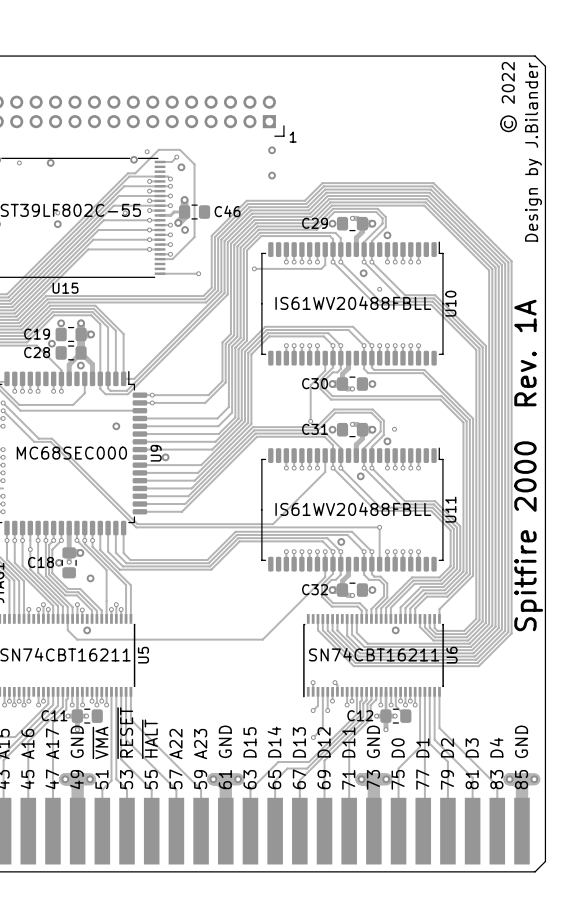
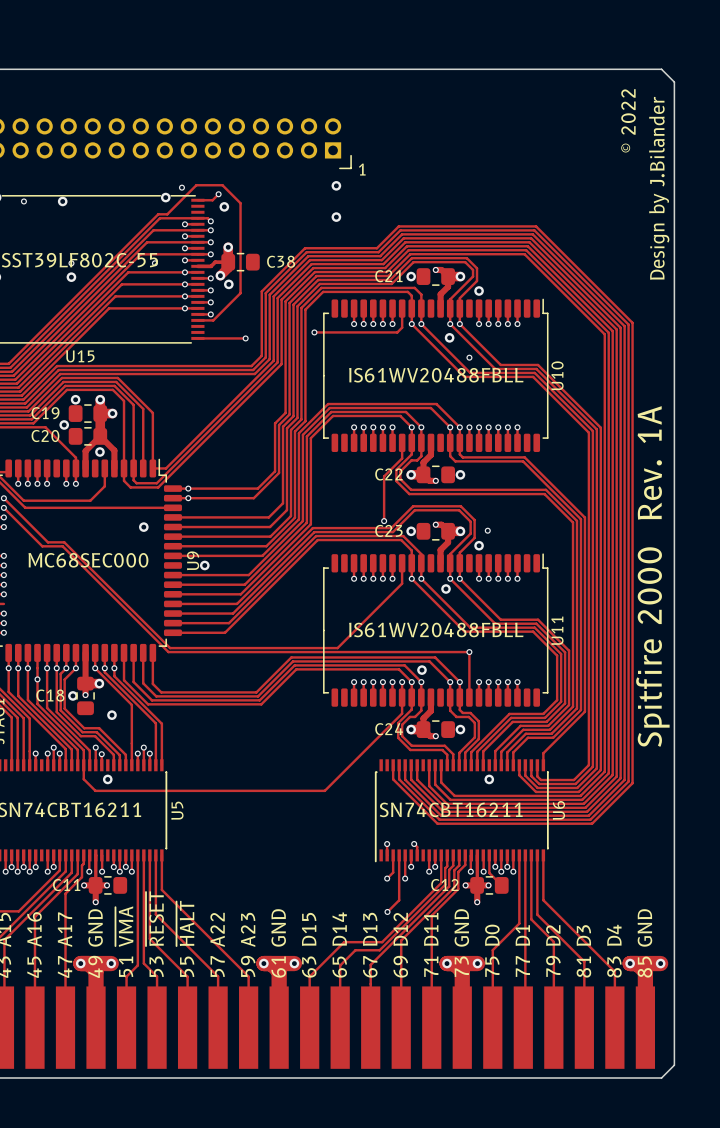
C46 name: C46 (227, 211) -> C38 (281, 261)
C29 name: C29 (315, 223) -> C21 (388, 276)
C28 name: C28 (37, 352) -> C20 (45, 436)
C30 name: C30 (315, 383) -> C22 (388, 474)
C31 name: C31 (315, 429) -> C23 (388, 530)
C32 name: C32 (315, 589) -> C24 (389, 729)

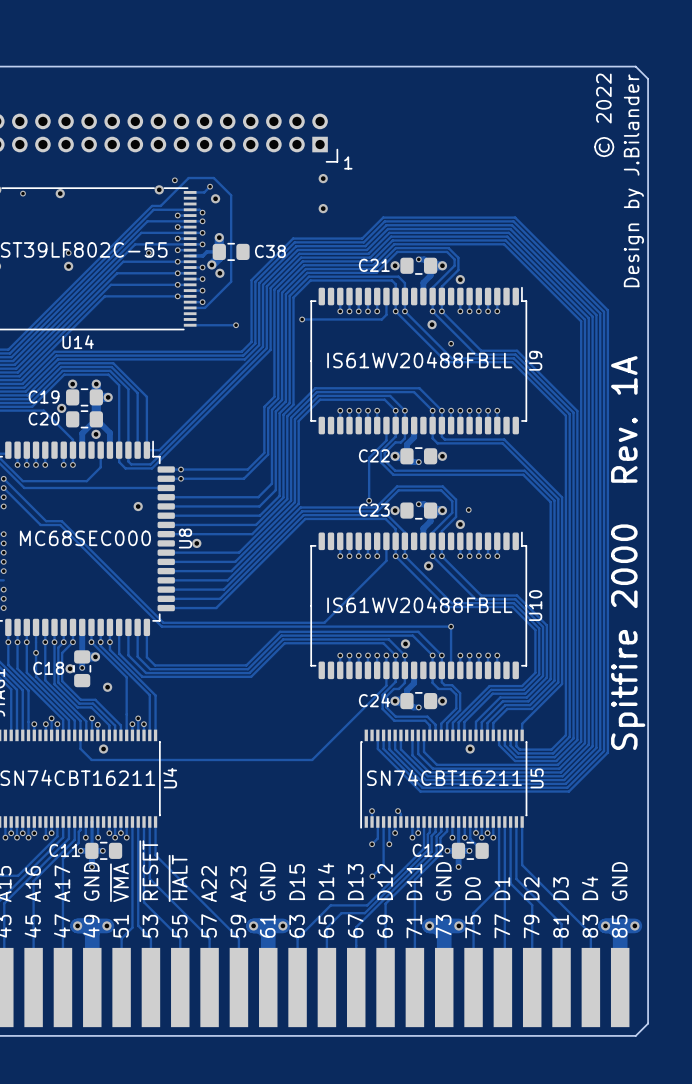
U15 name: U15 (80, 356) -> U14 (78, 342)
U10 name: U10 (557, 375) -> U9 (535, 360)
U9 name: U9 (193, 560) -> U8 (185, 538)
U11 name: U11 (557, 630) -> U10 (535, 605)
U5 name: U5 (177, 810) -> U4 (170, 778)
U6 name: U6 (558, 810) -> U5 (537, 778)

